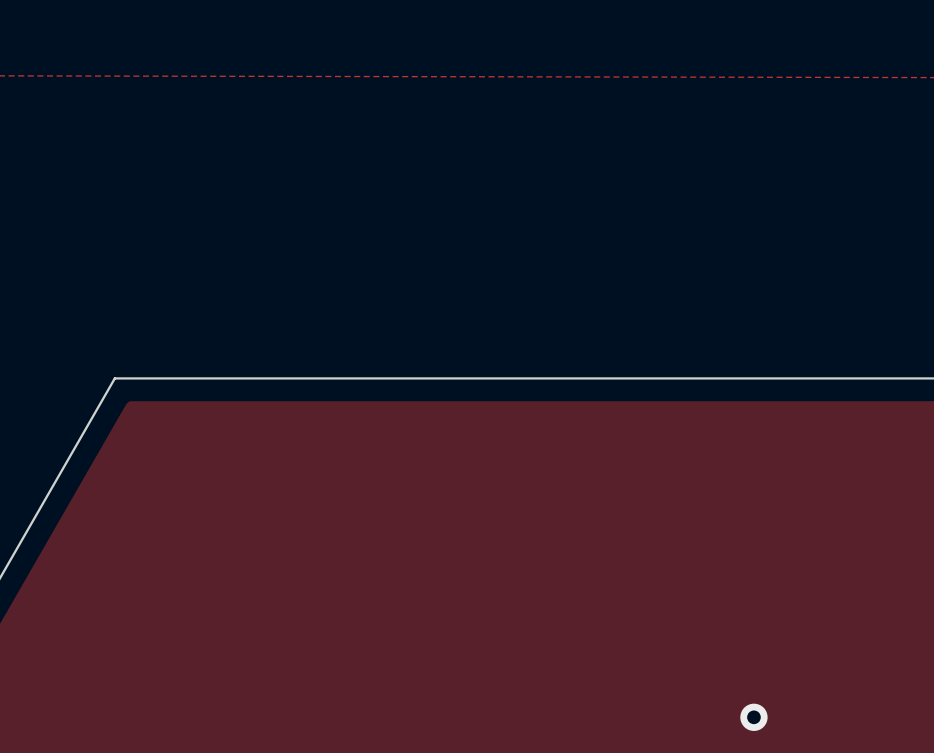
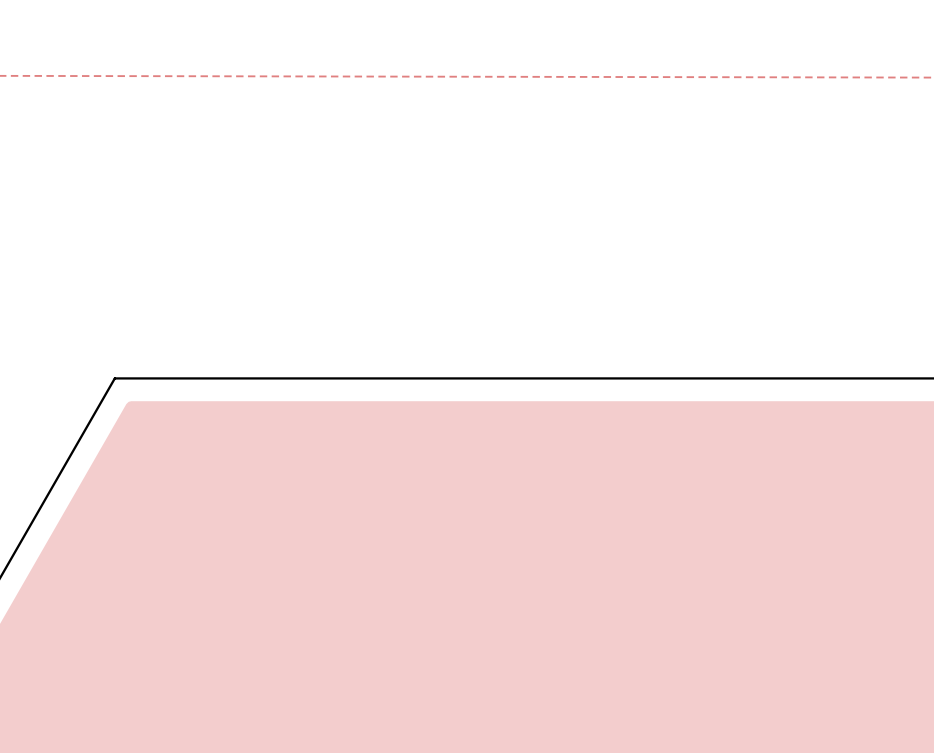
via: (753, 717) -> none

